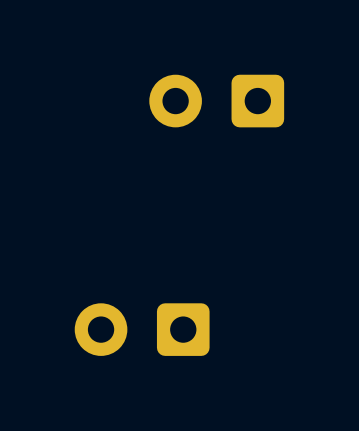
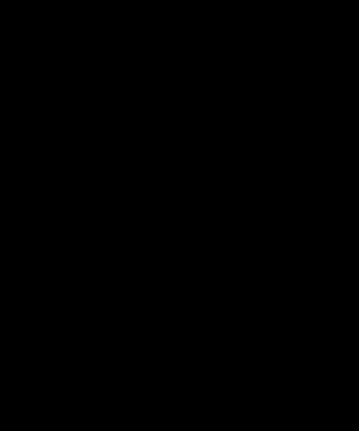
part: (216, 101) -> none
part: (142, 329) -> none

